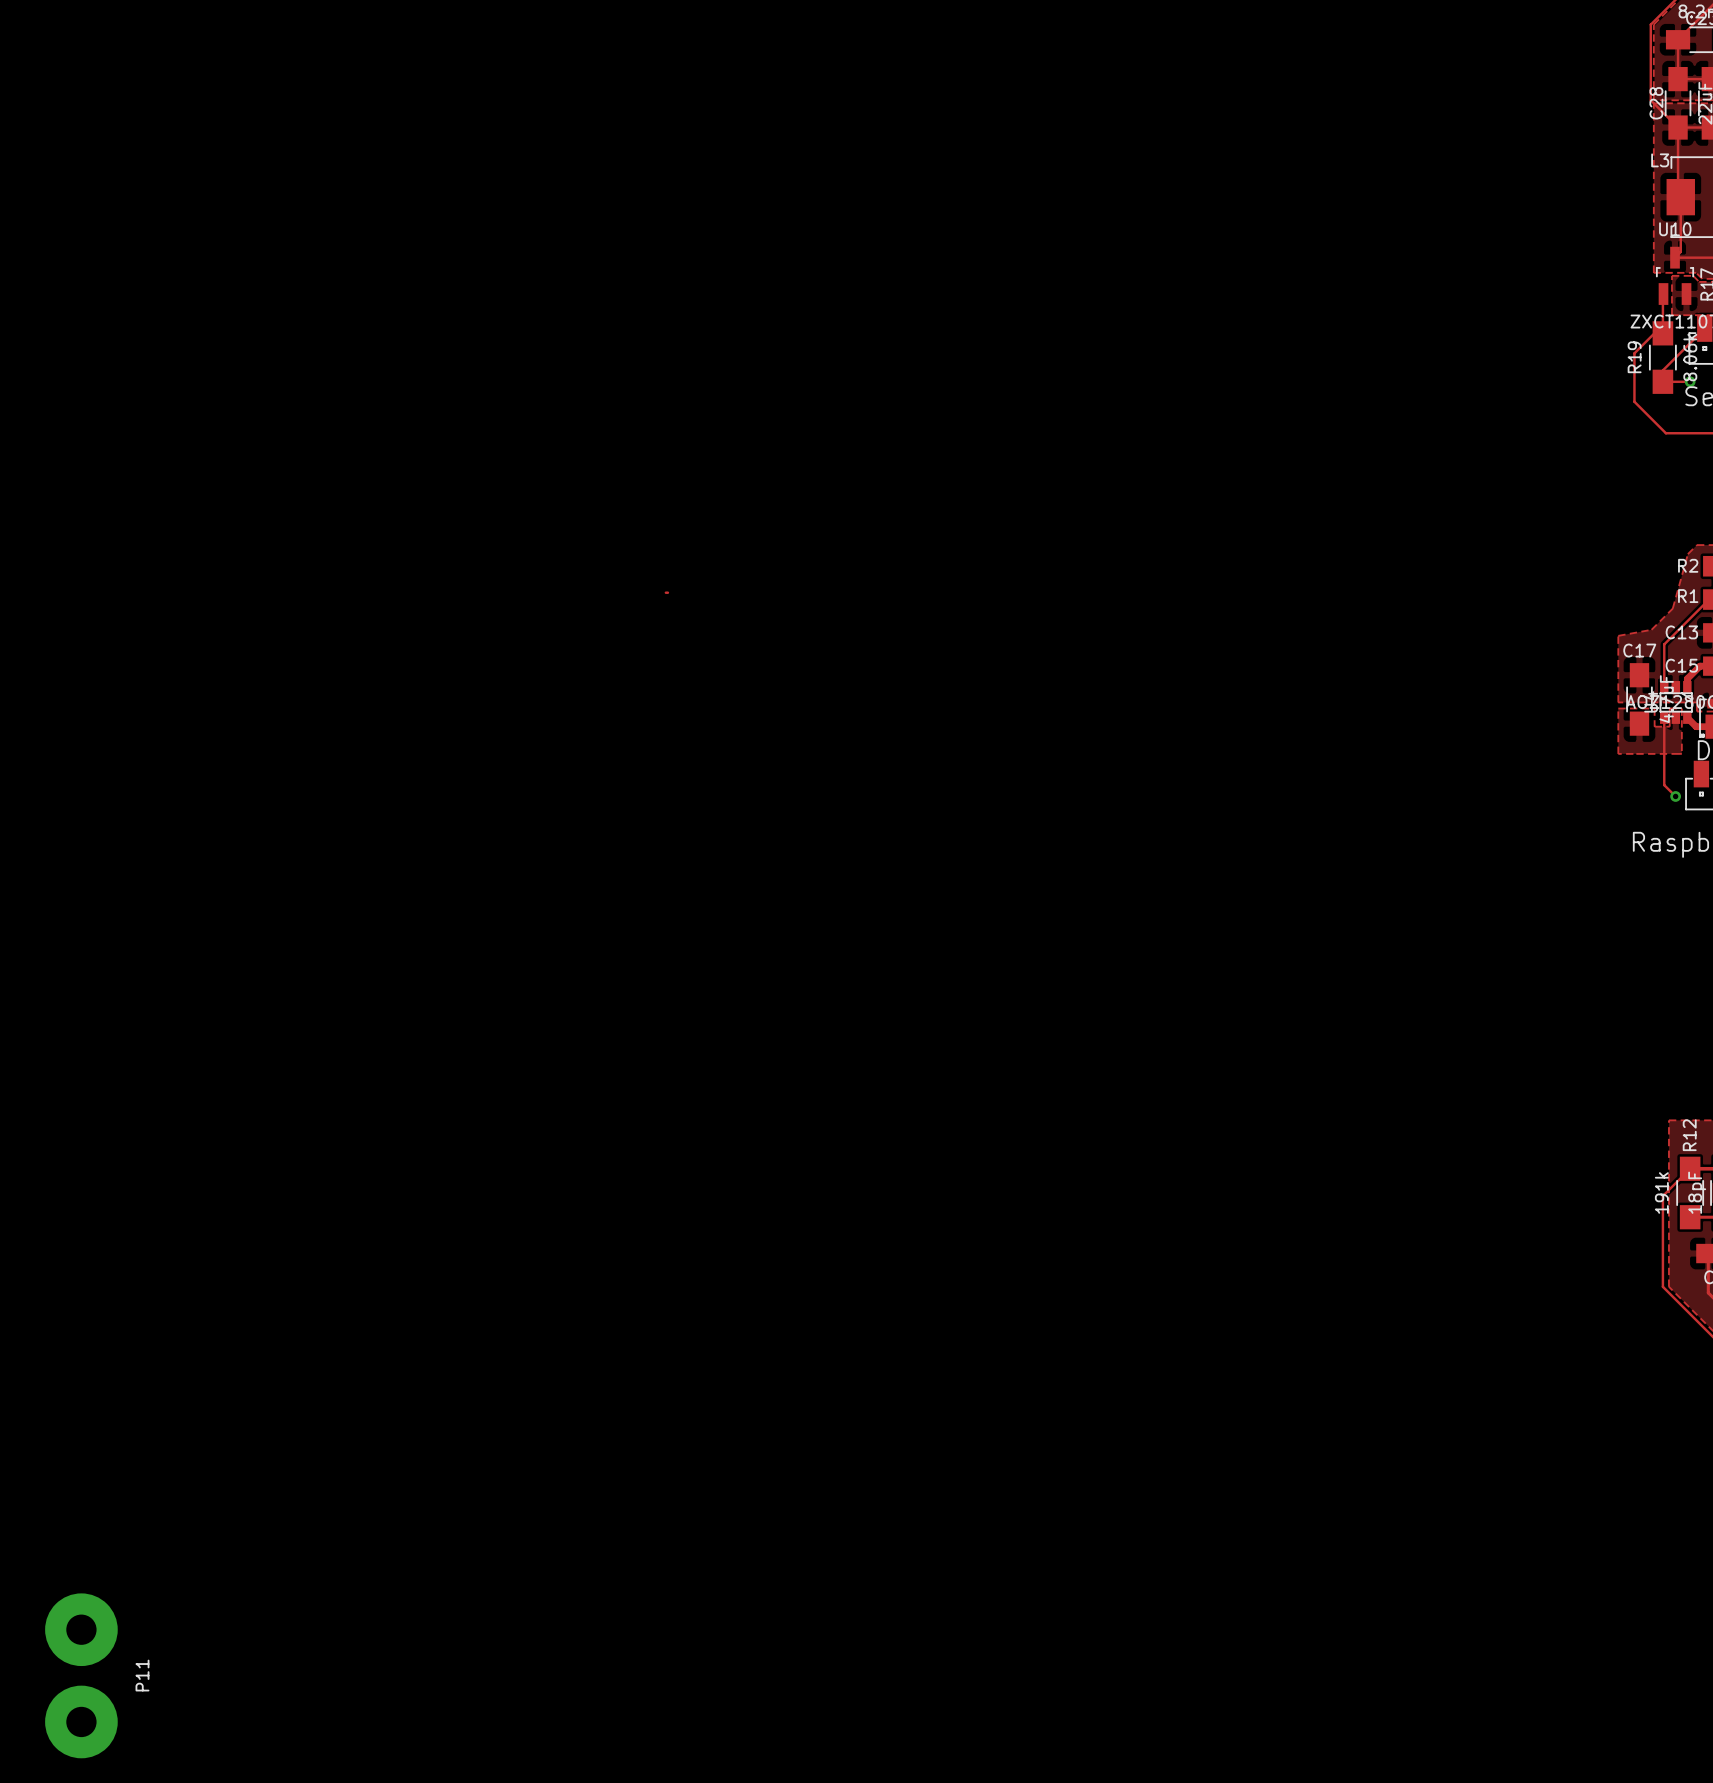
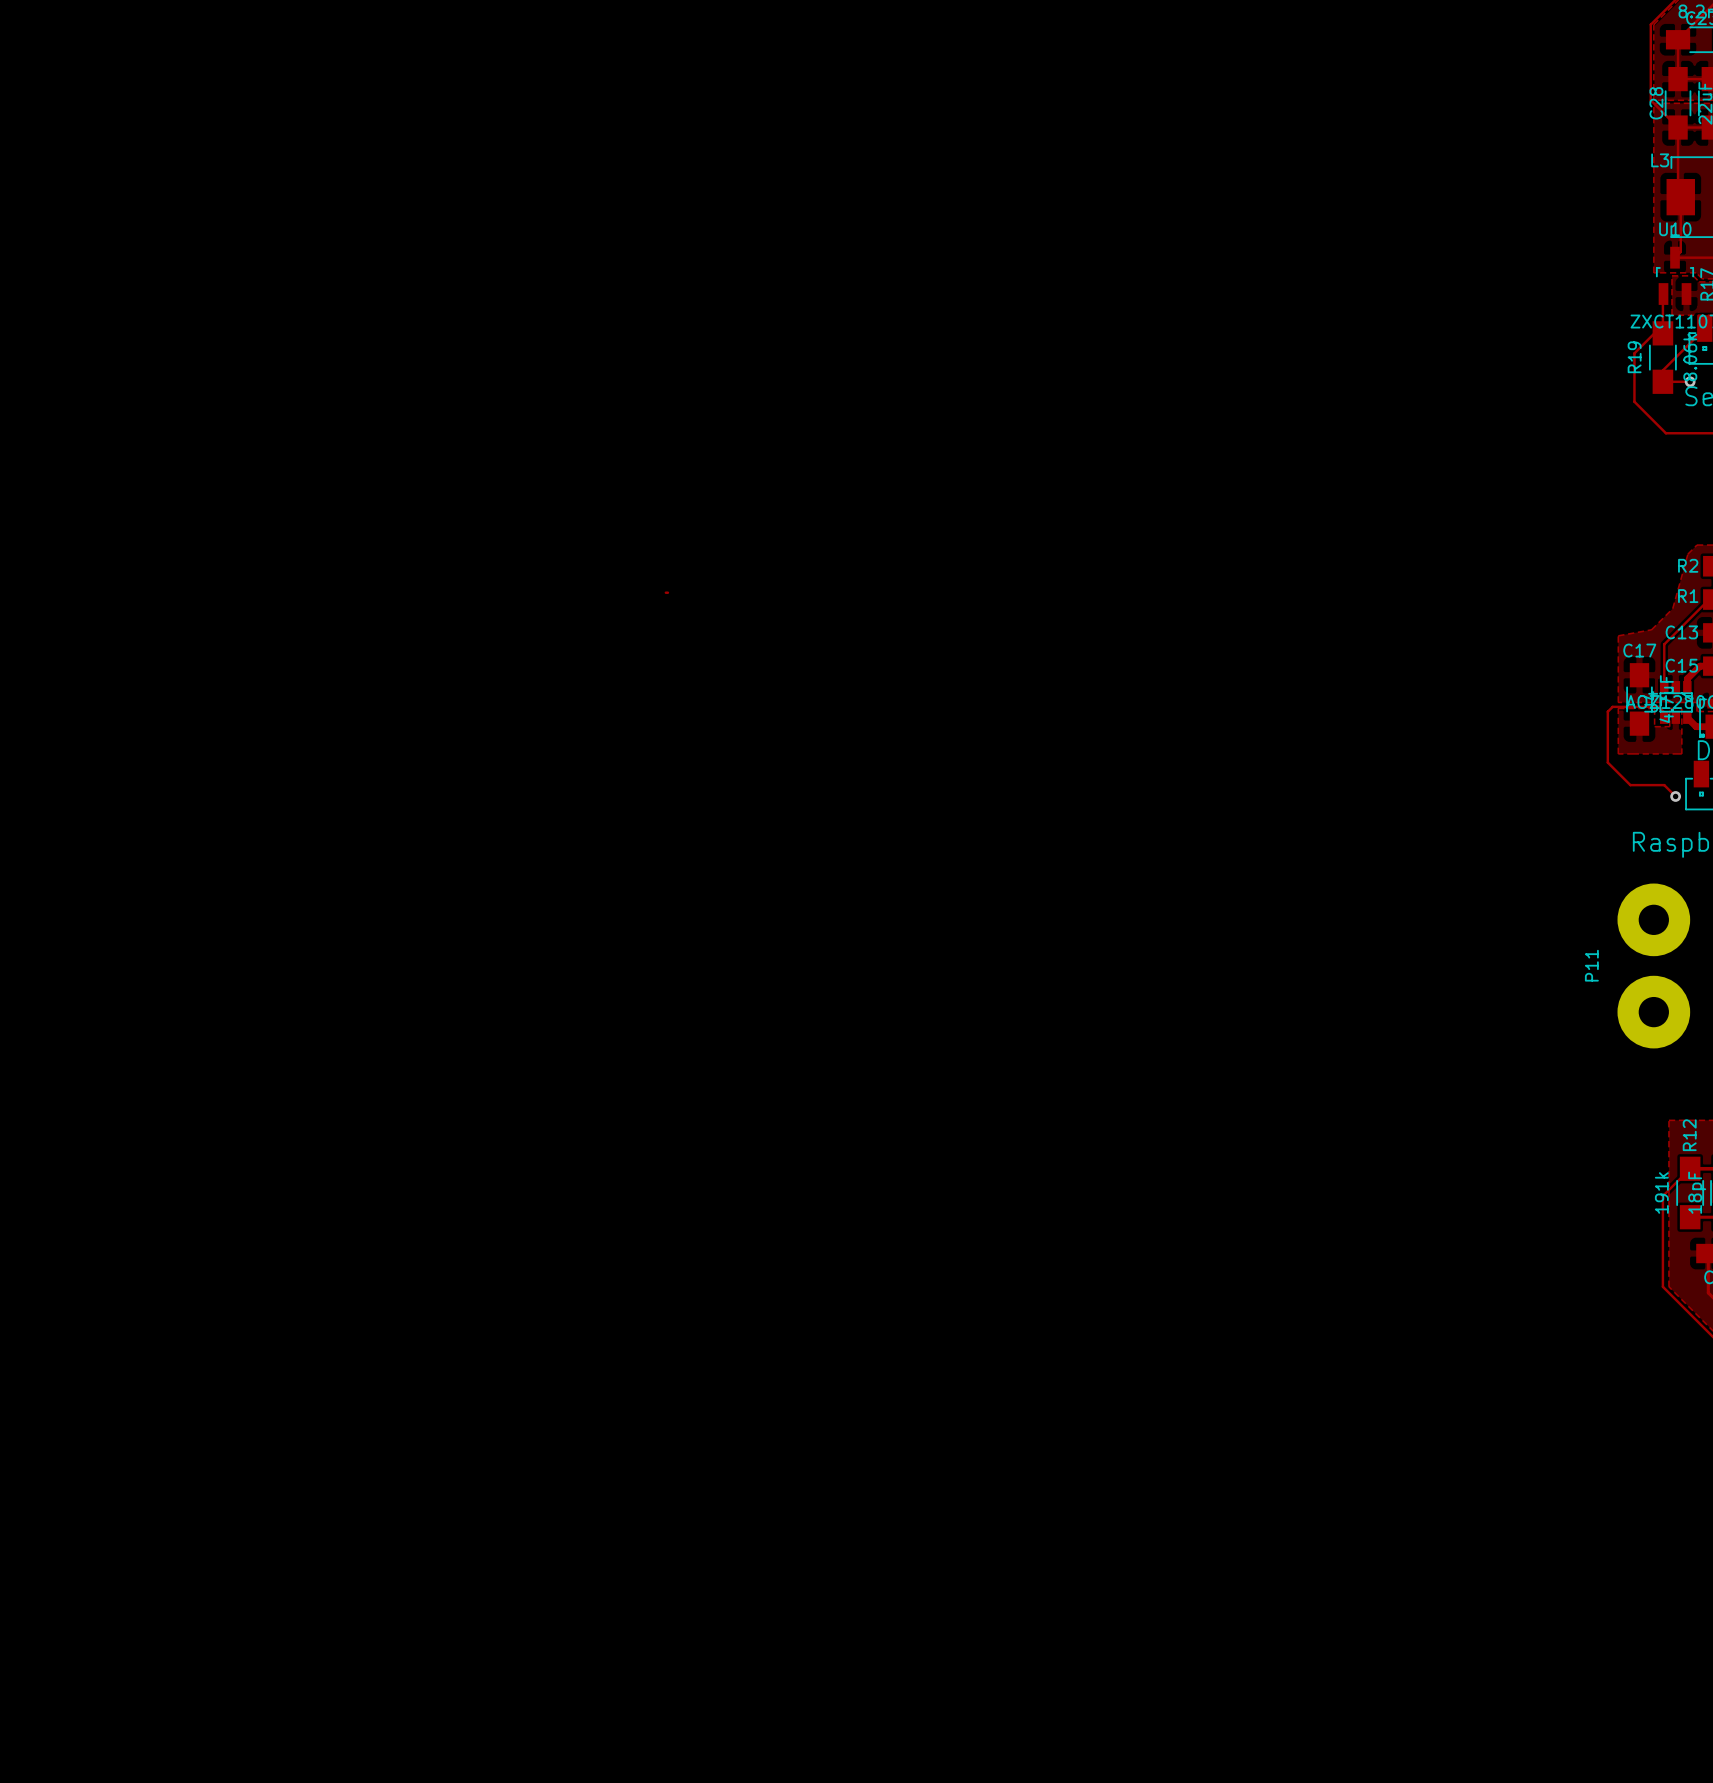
track: (1664, 717) (1664, 785) -> (1664, 715) (1658, 706) (1612, 706) (1607, 711) (1607, 762) (1630, 785) (1664, 785)
P11 position: (81, 1675) -> (1653, 965)
P11 name position: P11 (142, 1675) -> P11 (1591, 965)

